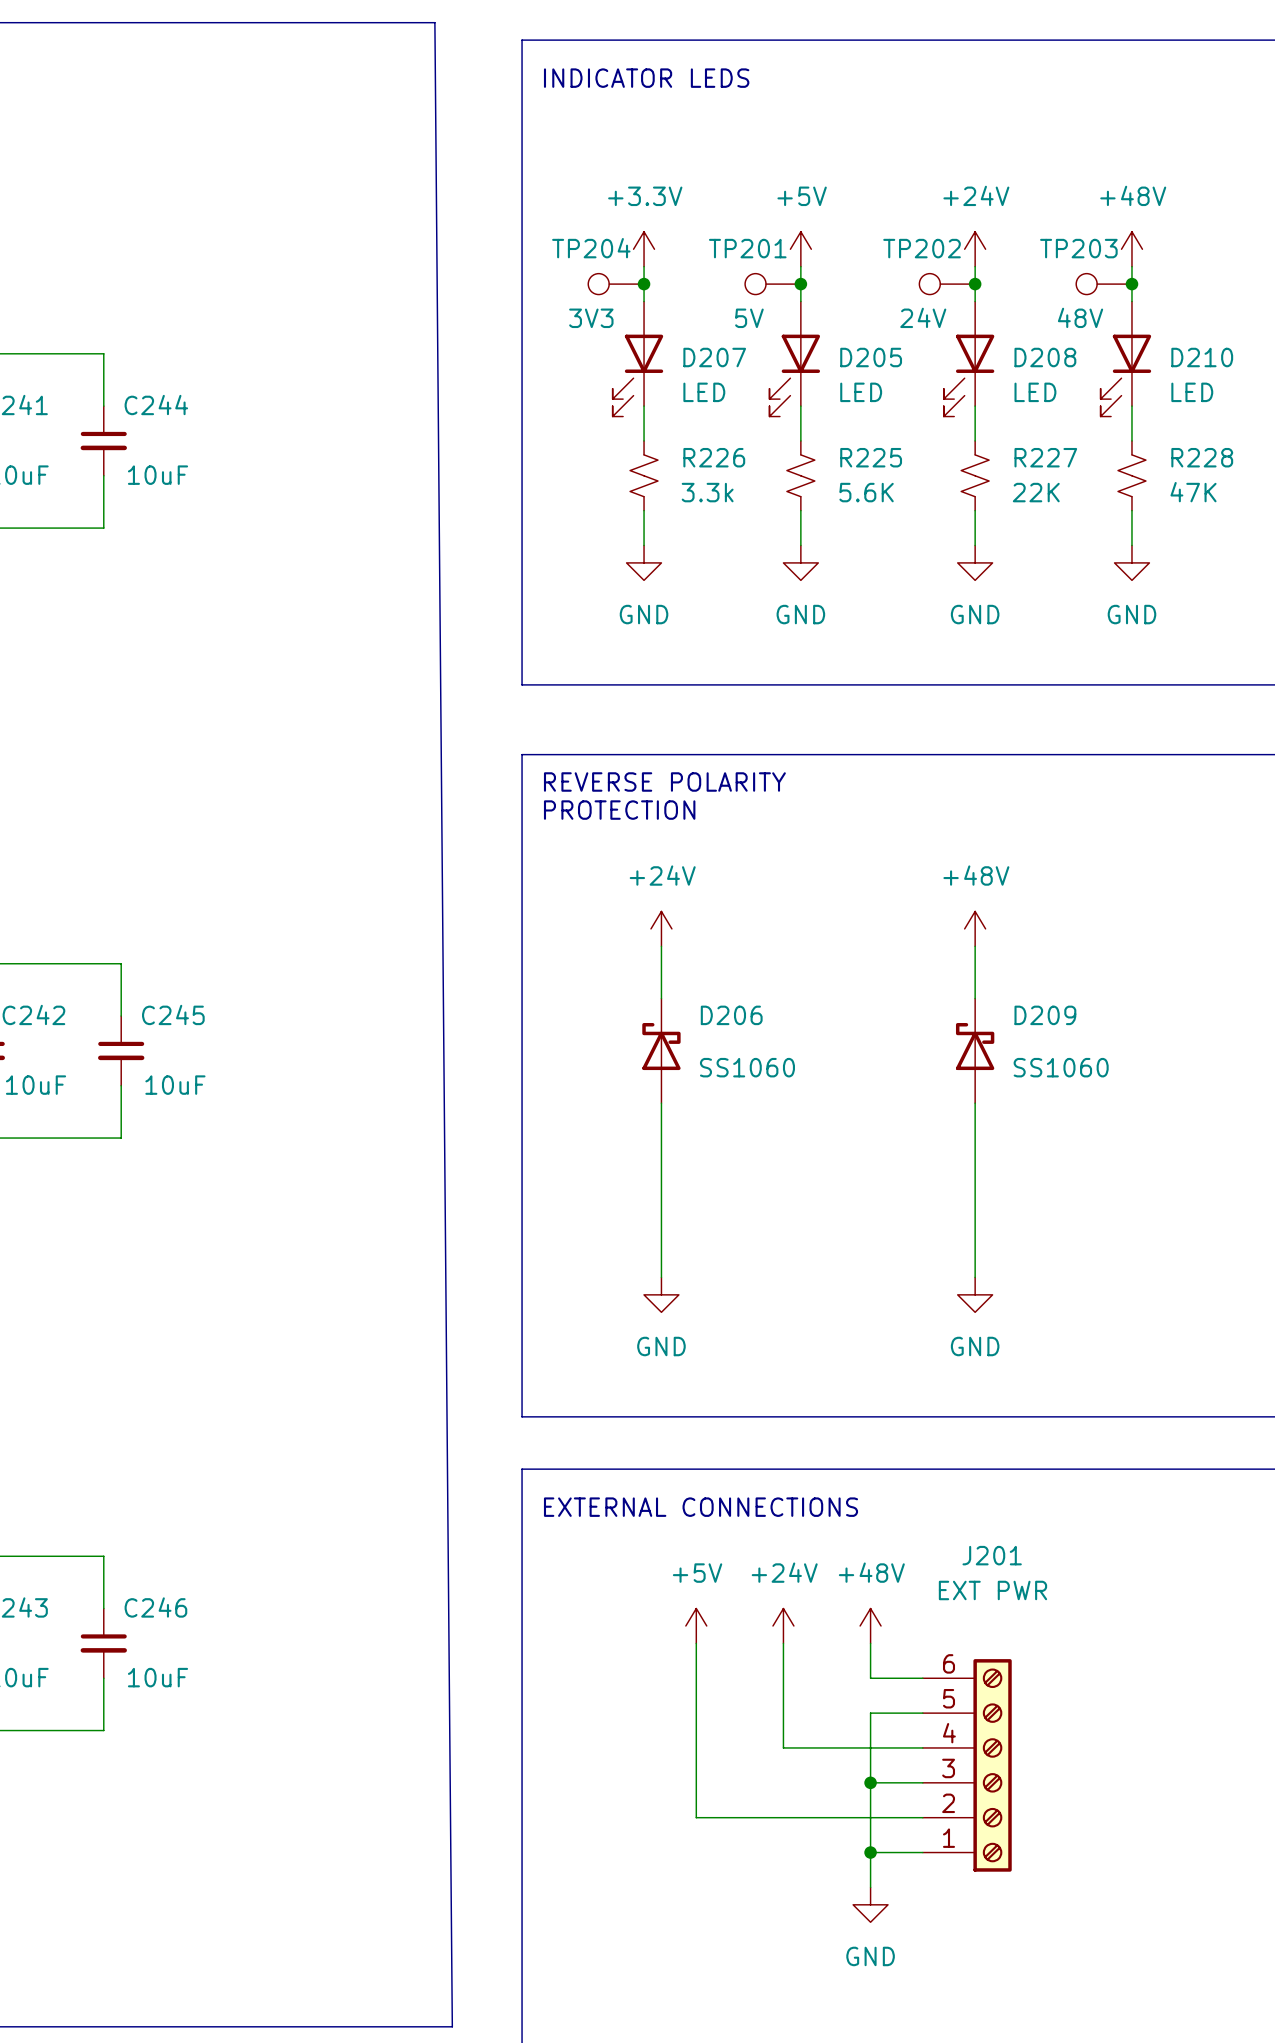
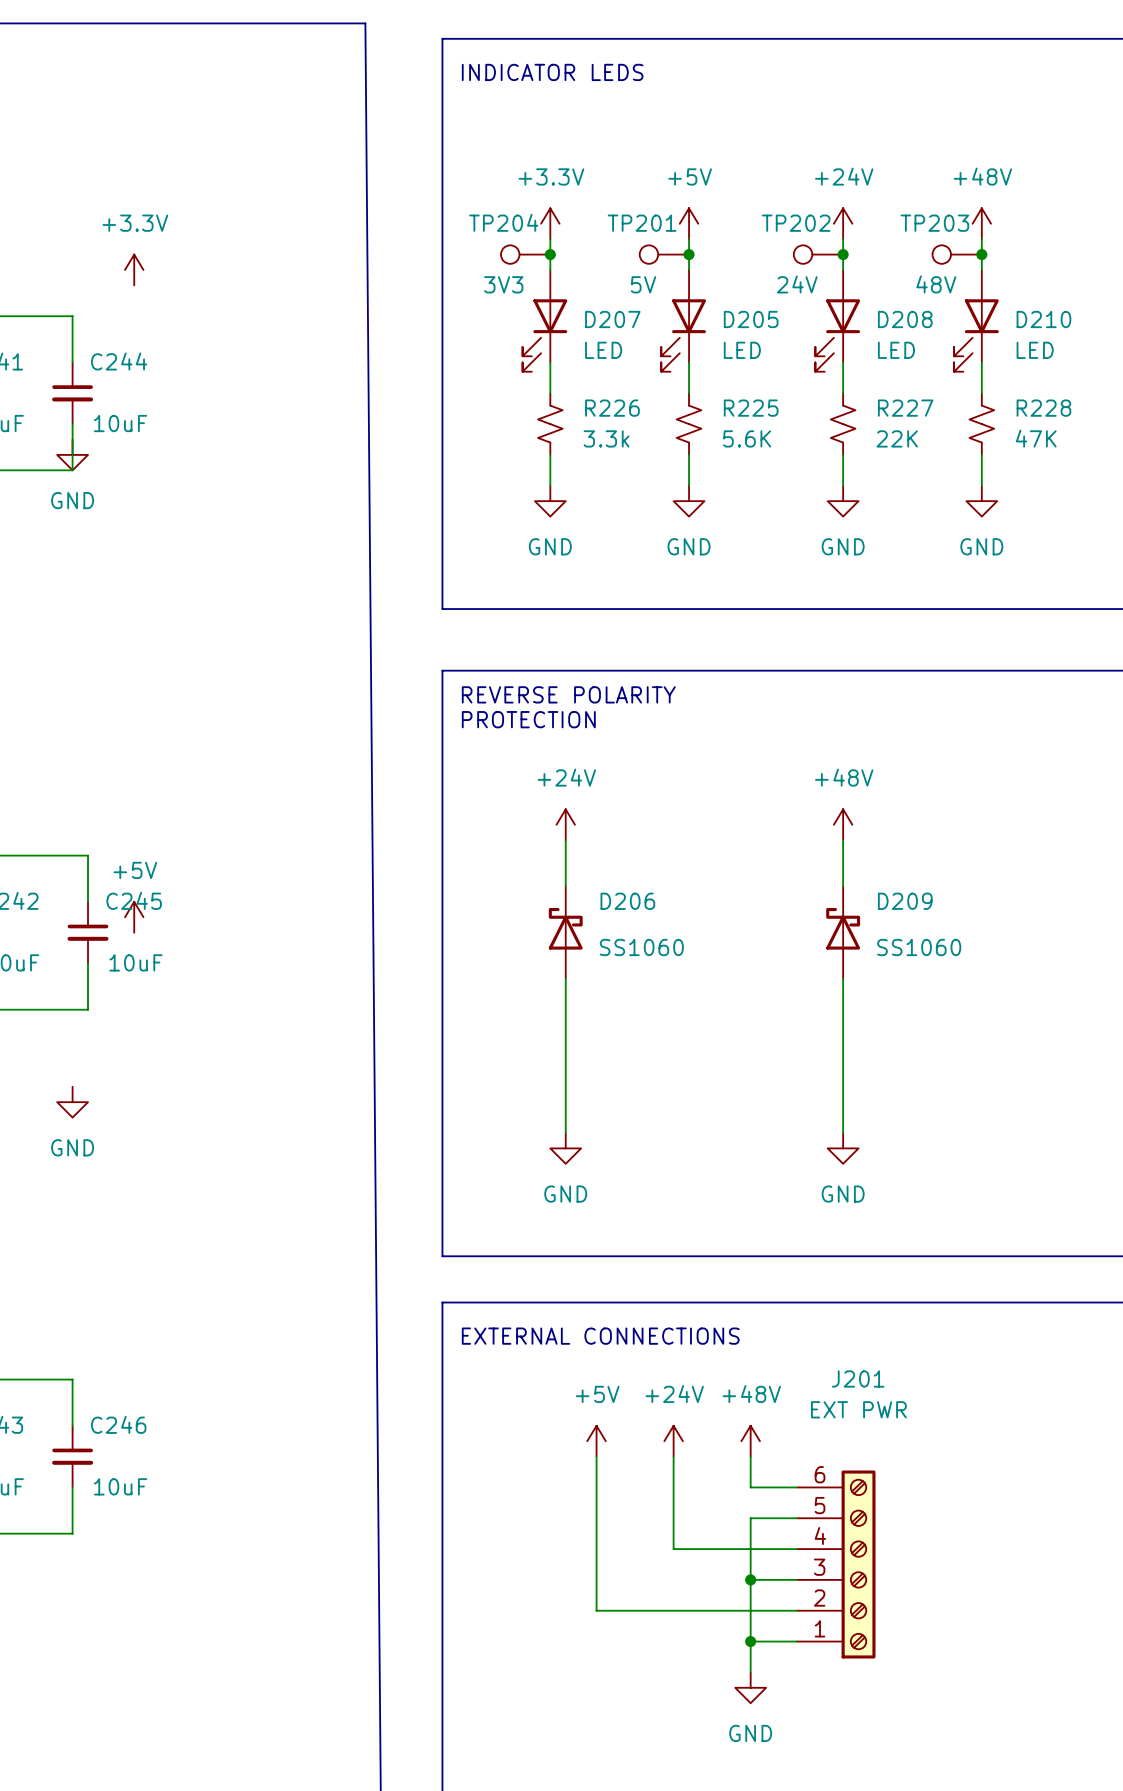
power symbol: none -> +3.3V (134, 269)
power symbol: none -> GND (72, 454)
power symbol: none -> +5V (134, 917)
power symbol: none -> GND (72, 1102)

